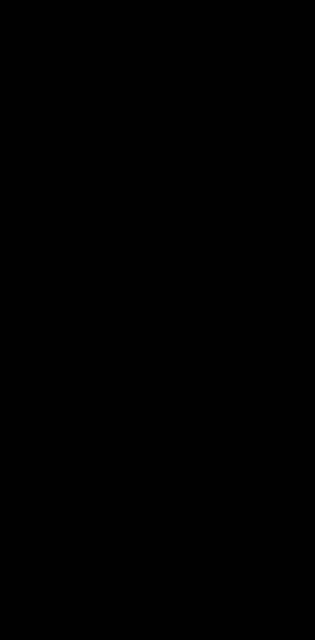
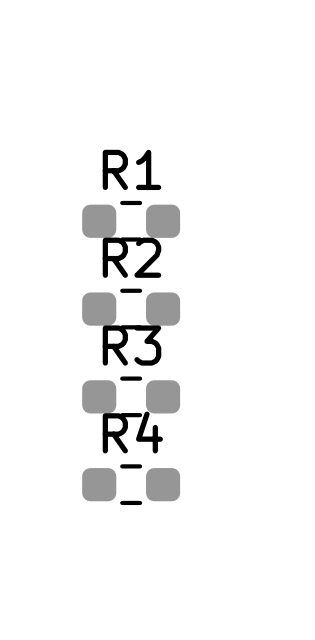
R1: none -> (131, 221)
R2: none -> (131, 309)
R3: none -> (131, 396)
R4: none -> (131, 484)

